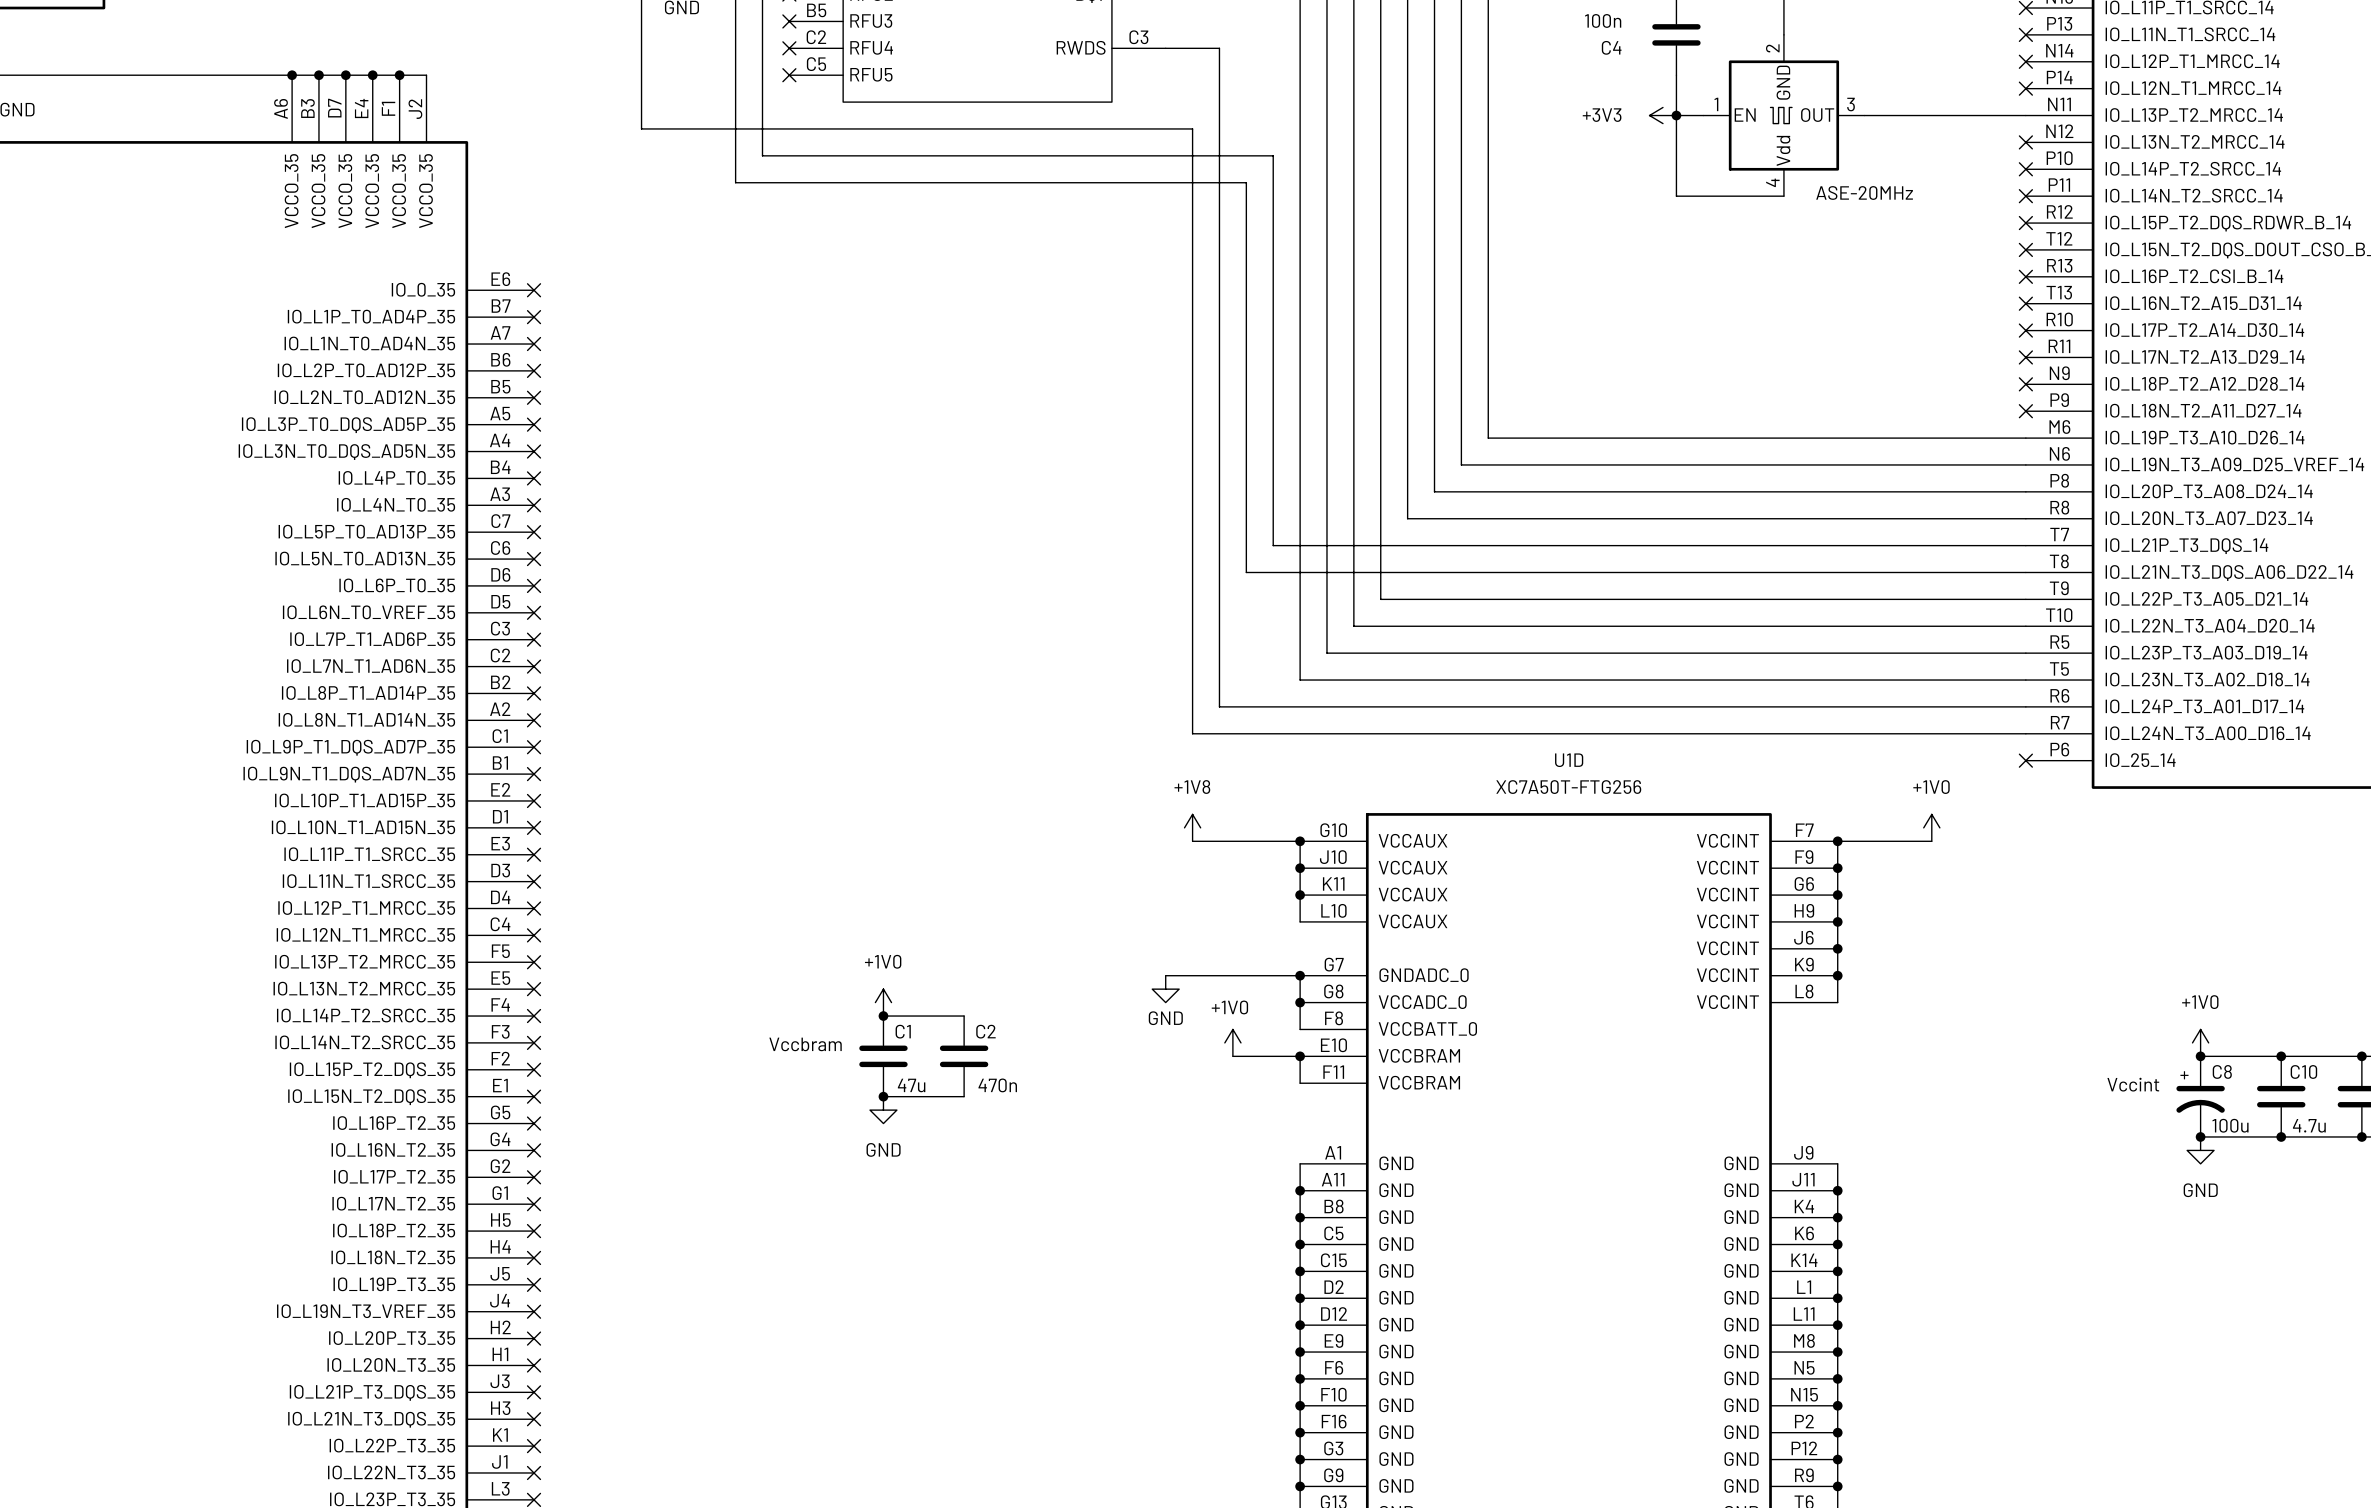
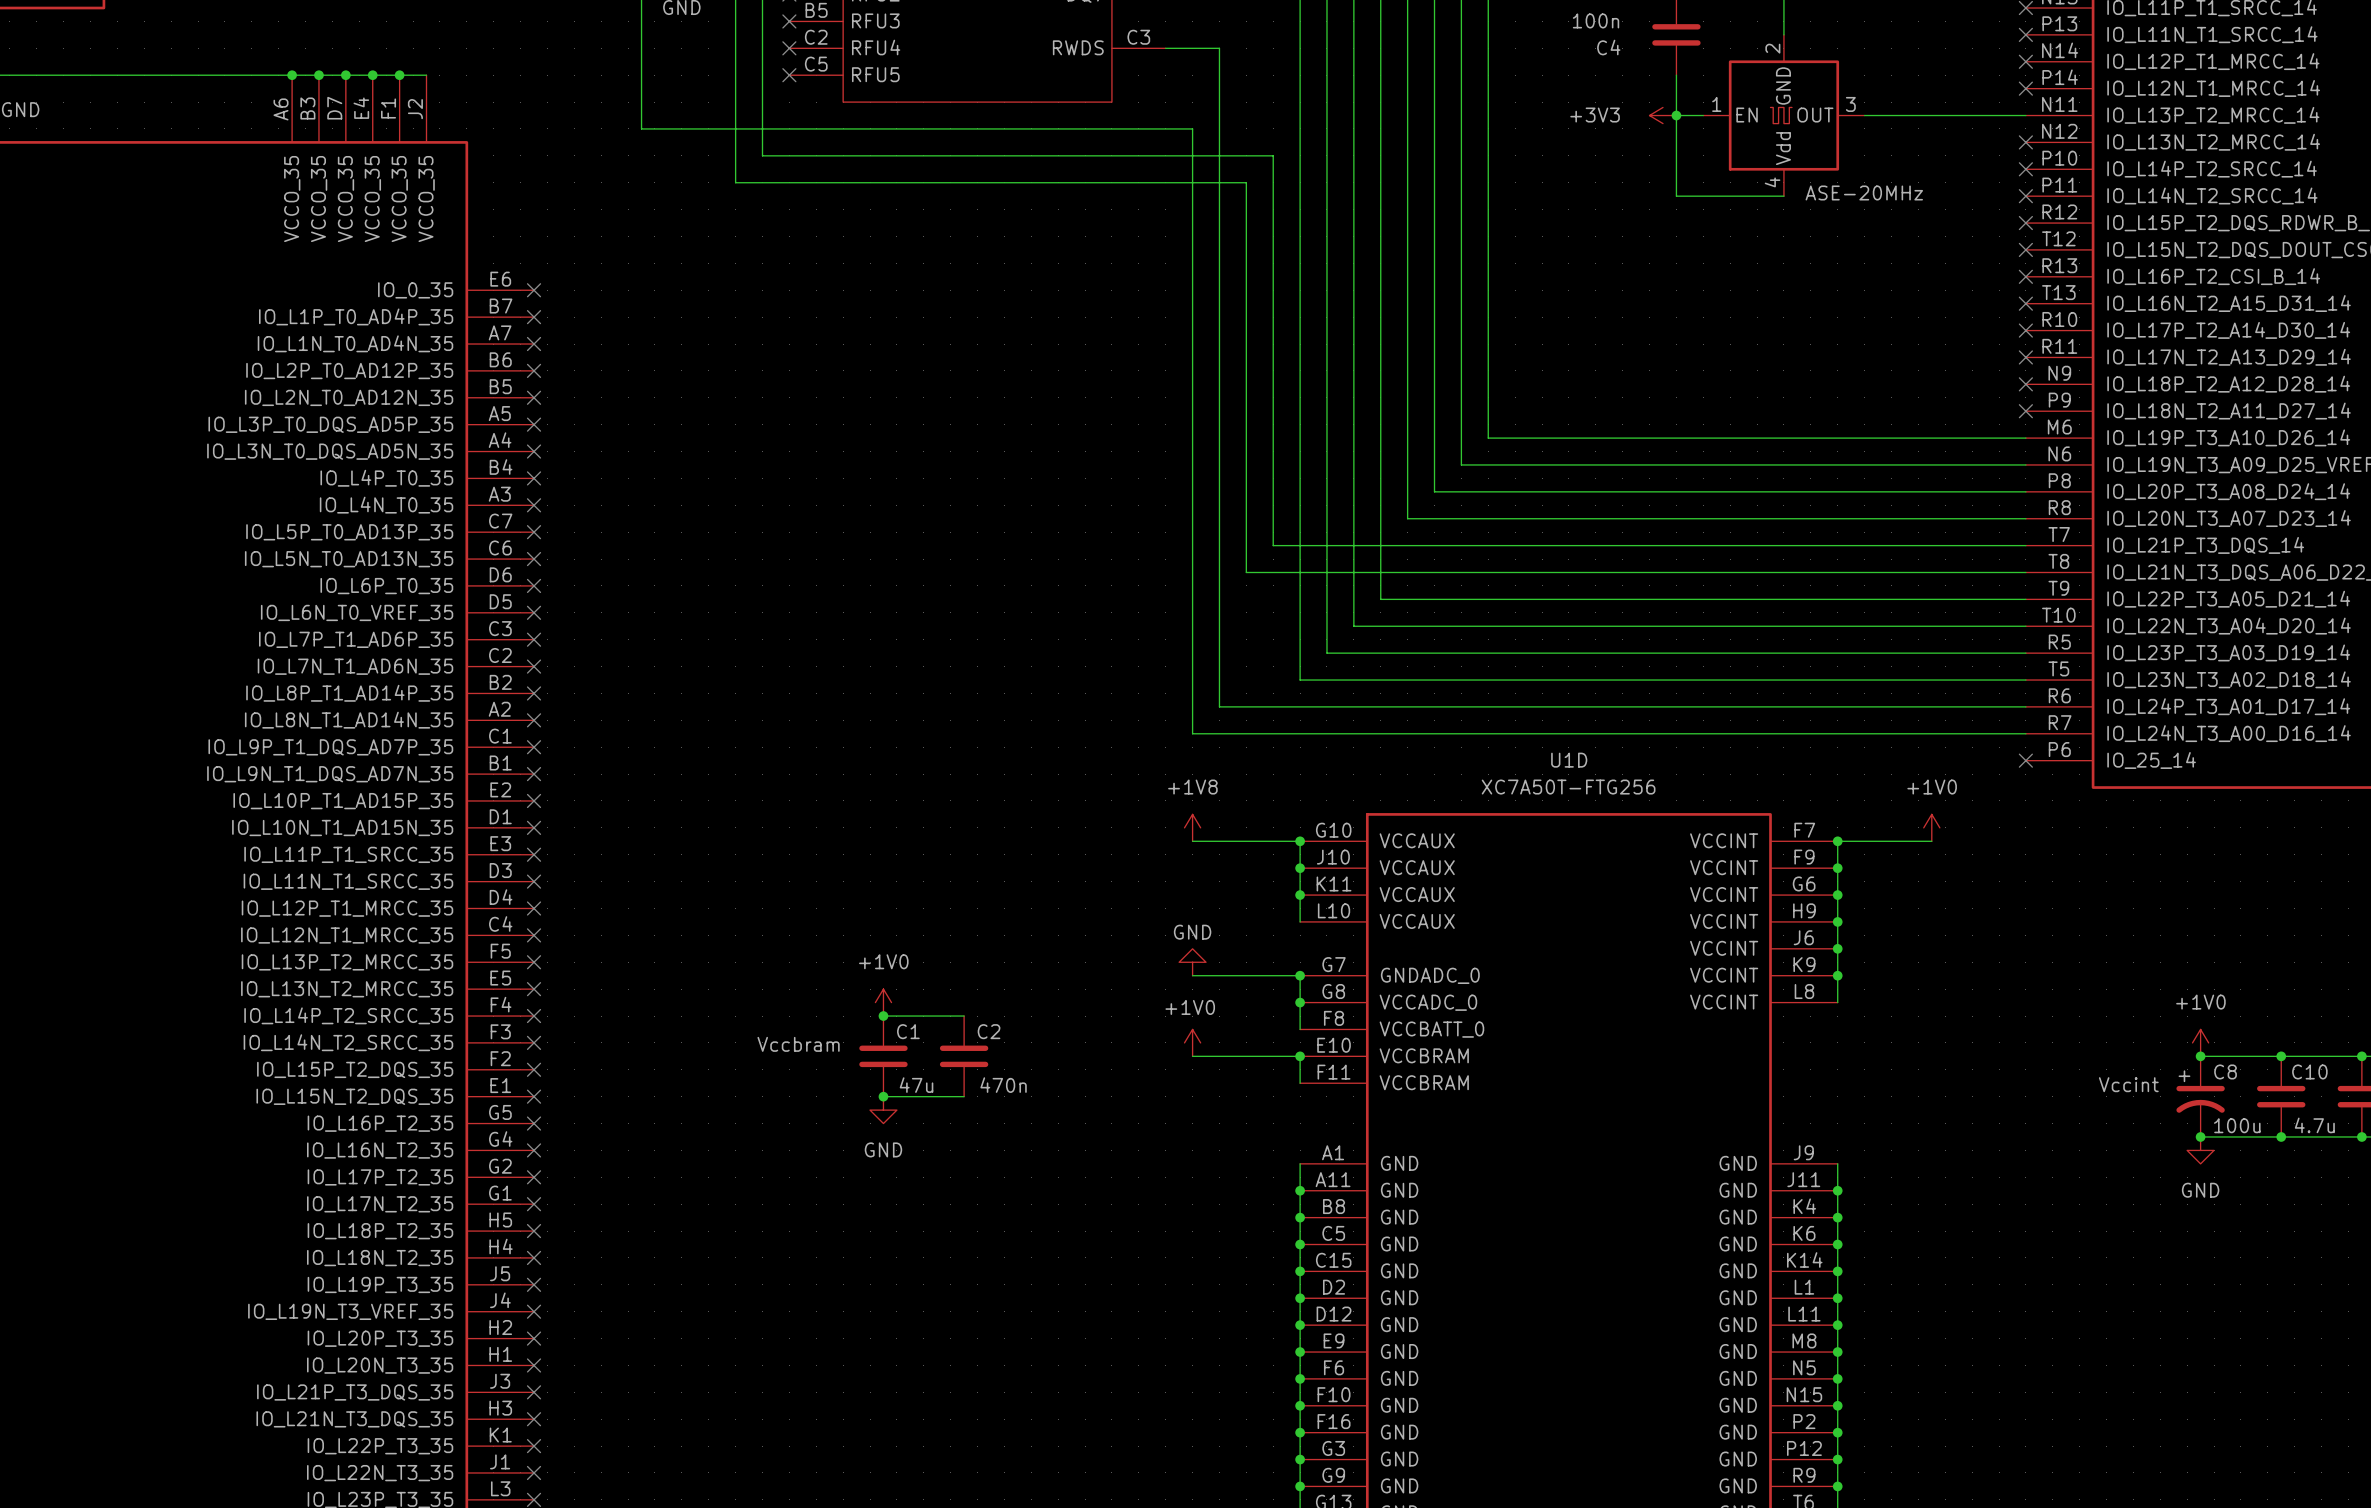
wire: (1165, 975) (1192, 975) -> none
power symbol rotation: 0° (1165, 989) -> 180° (1192, 962)
power symbol position: GND (1165, 989) -> GND (1192, 962)
power symbol position: +1V0 (1232, 1042) -> +1V0 (1192, 1042)
wire: none -> (1192, 1056) (1232, 1056)

